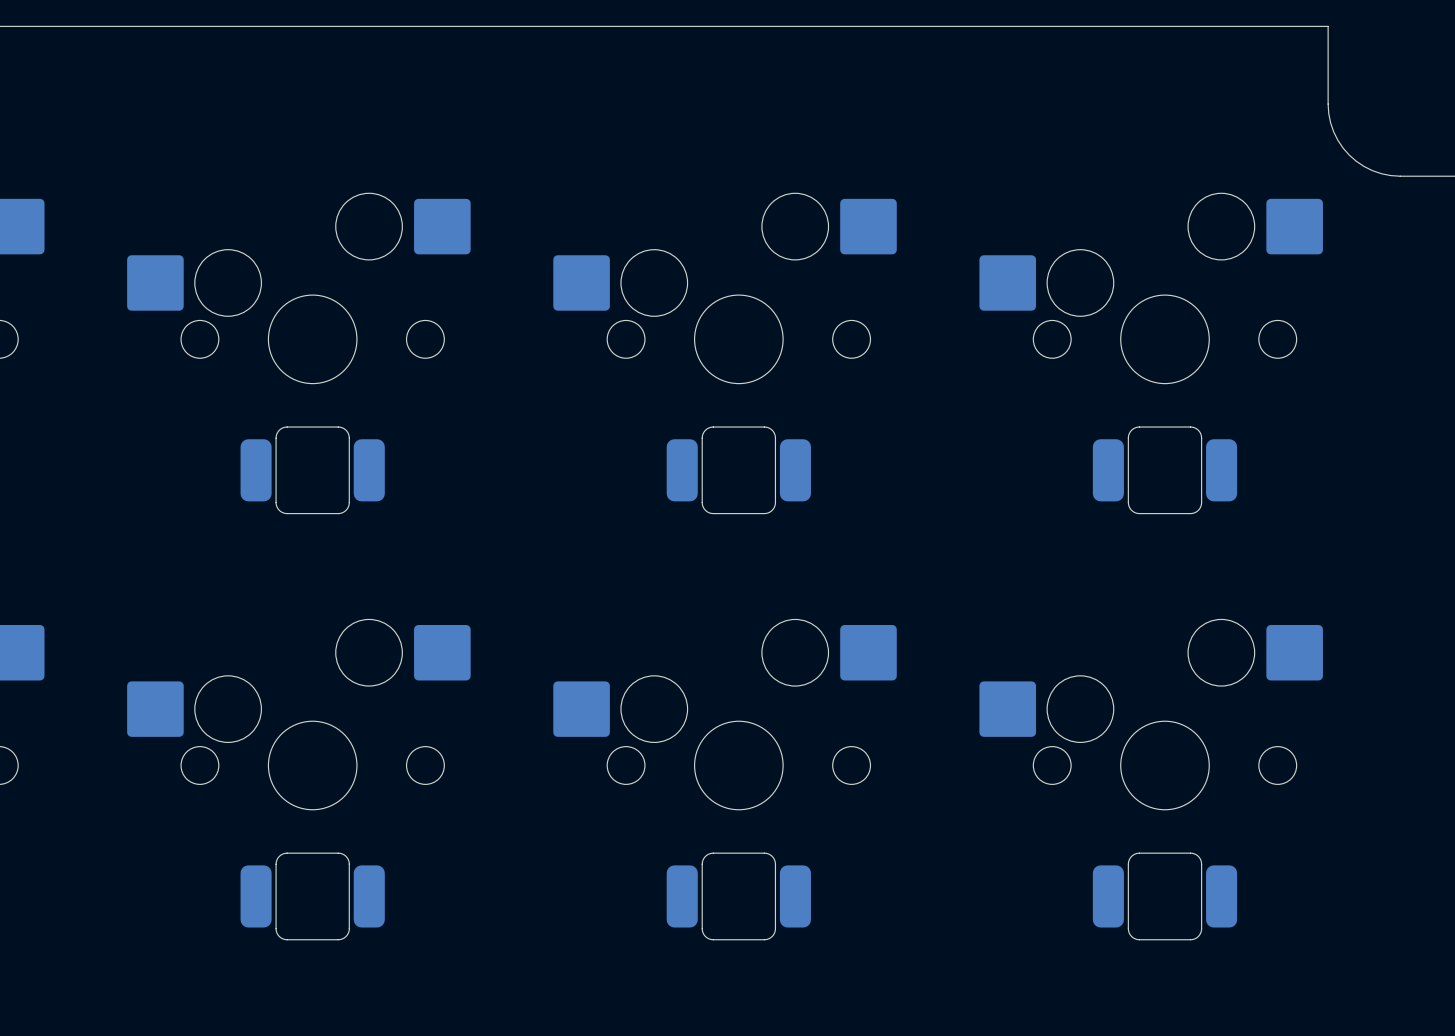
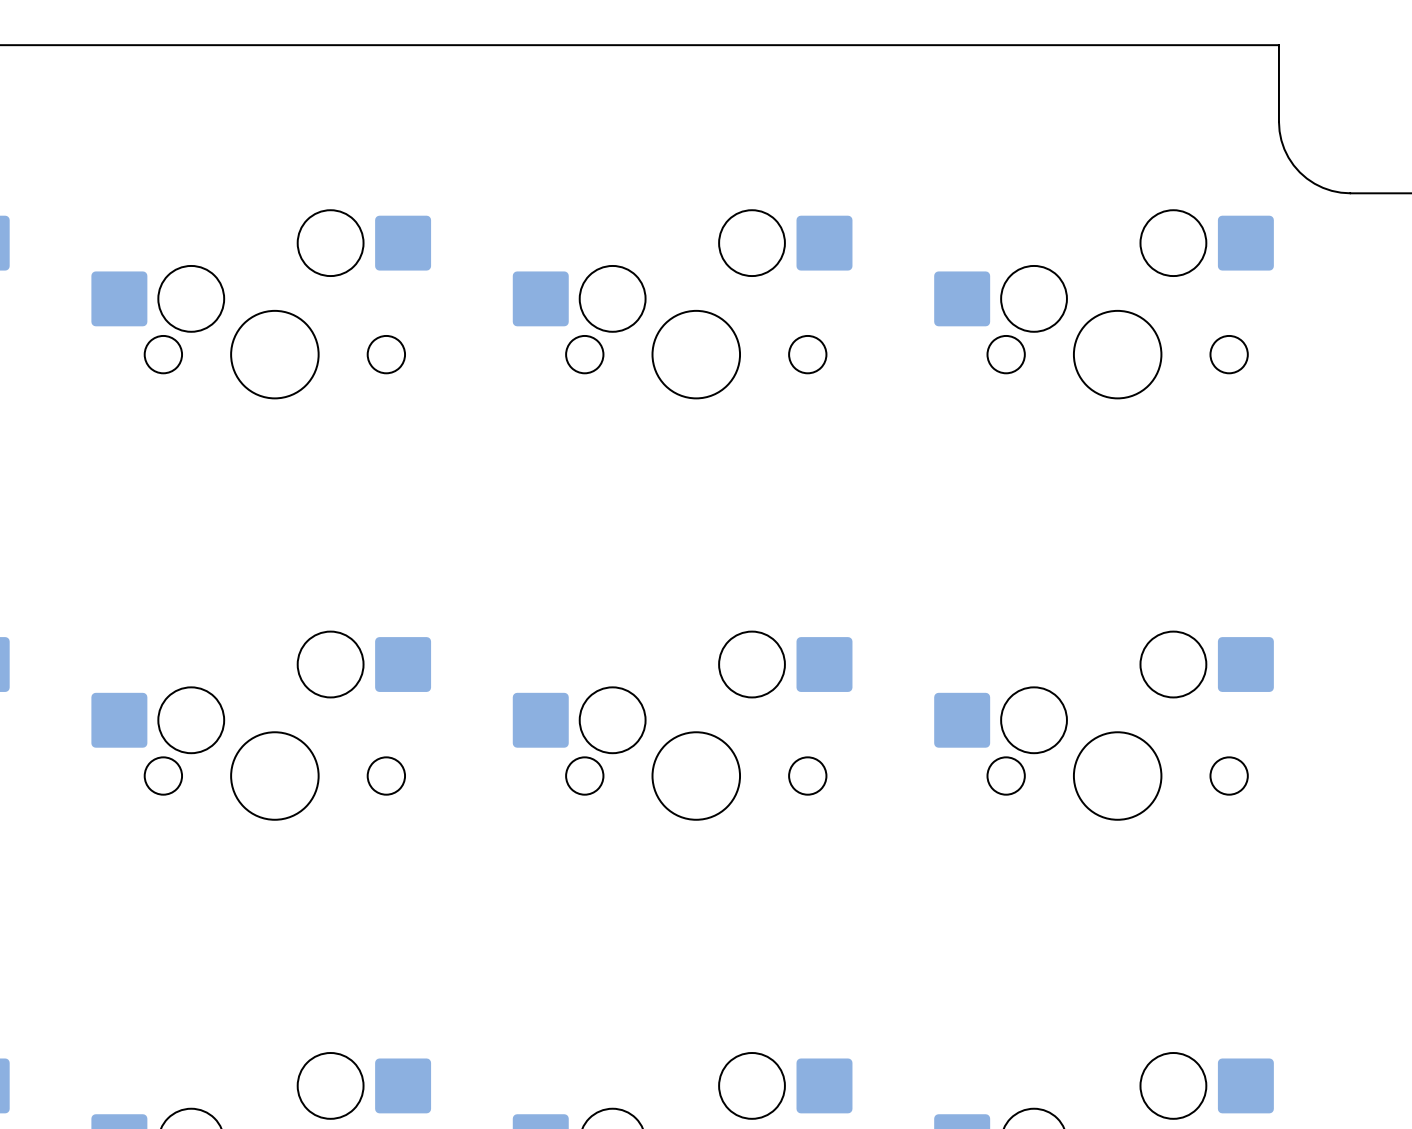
part: (312, 470) -> none
part: (738, 470) -> none
part: (1164, 470) -> none
part: (312, 896) -> none
part: (738, 896) -> none
part: (1164, 896) -> none

